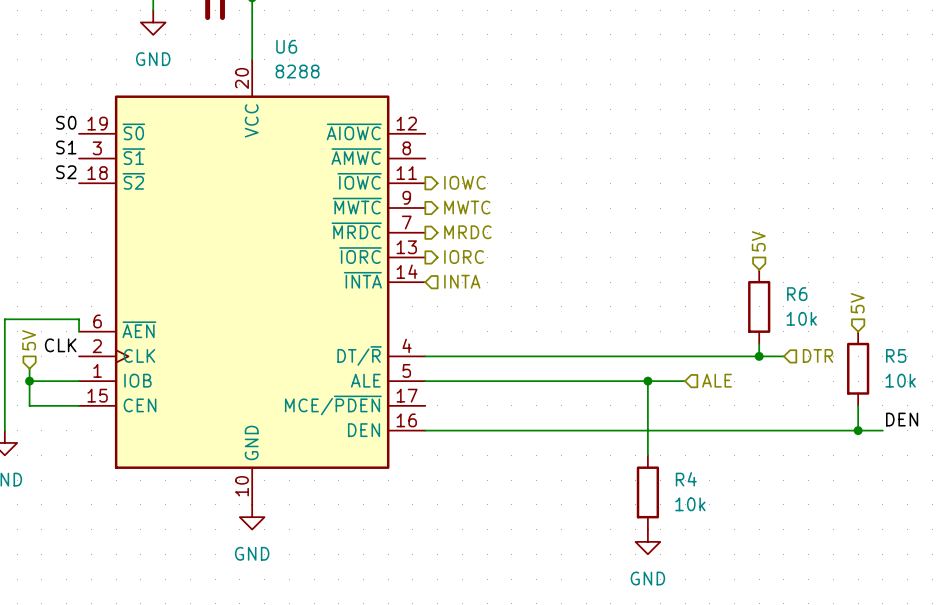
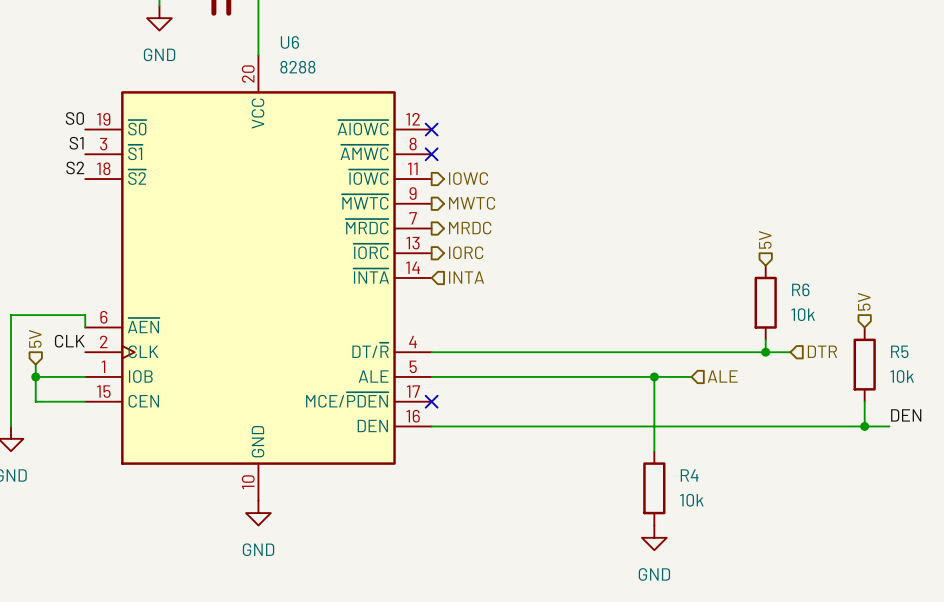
no-connect mark: none -> (431, 129)
no-connect mark: none -> (431, 154)
no-connect mark: none -> (431, 401)

